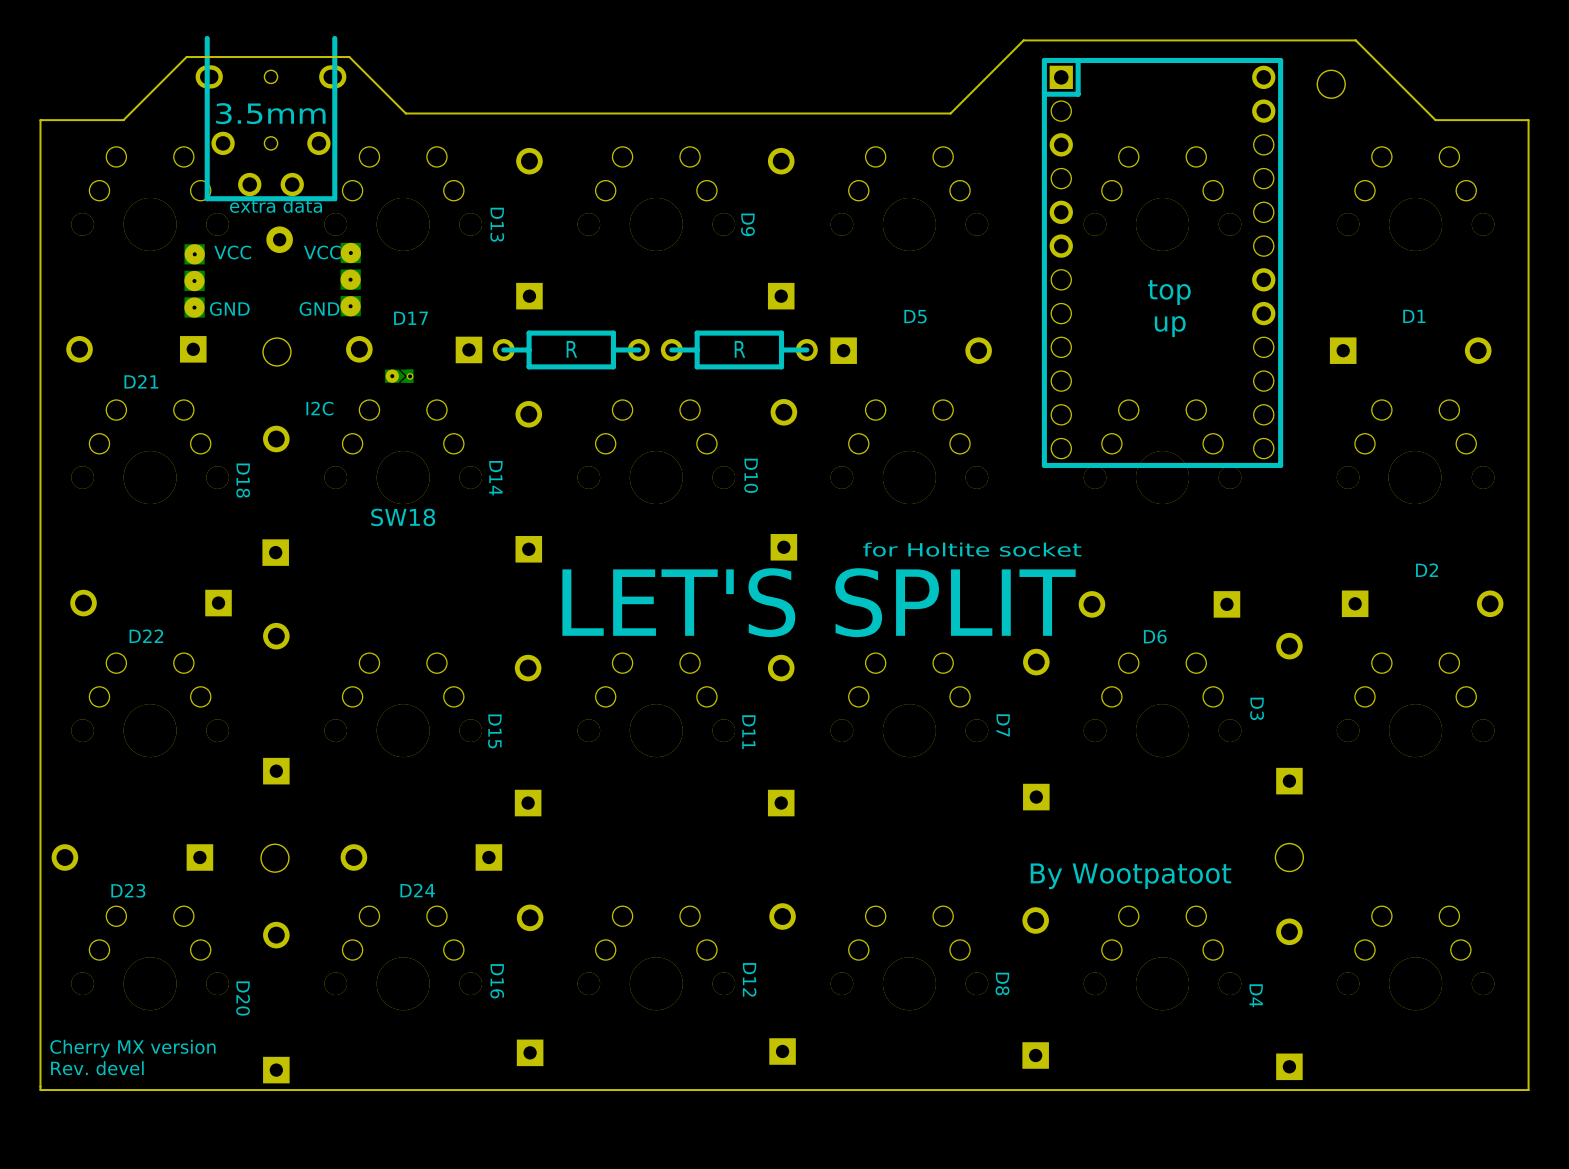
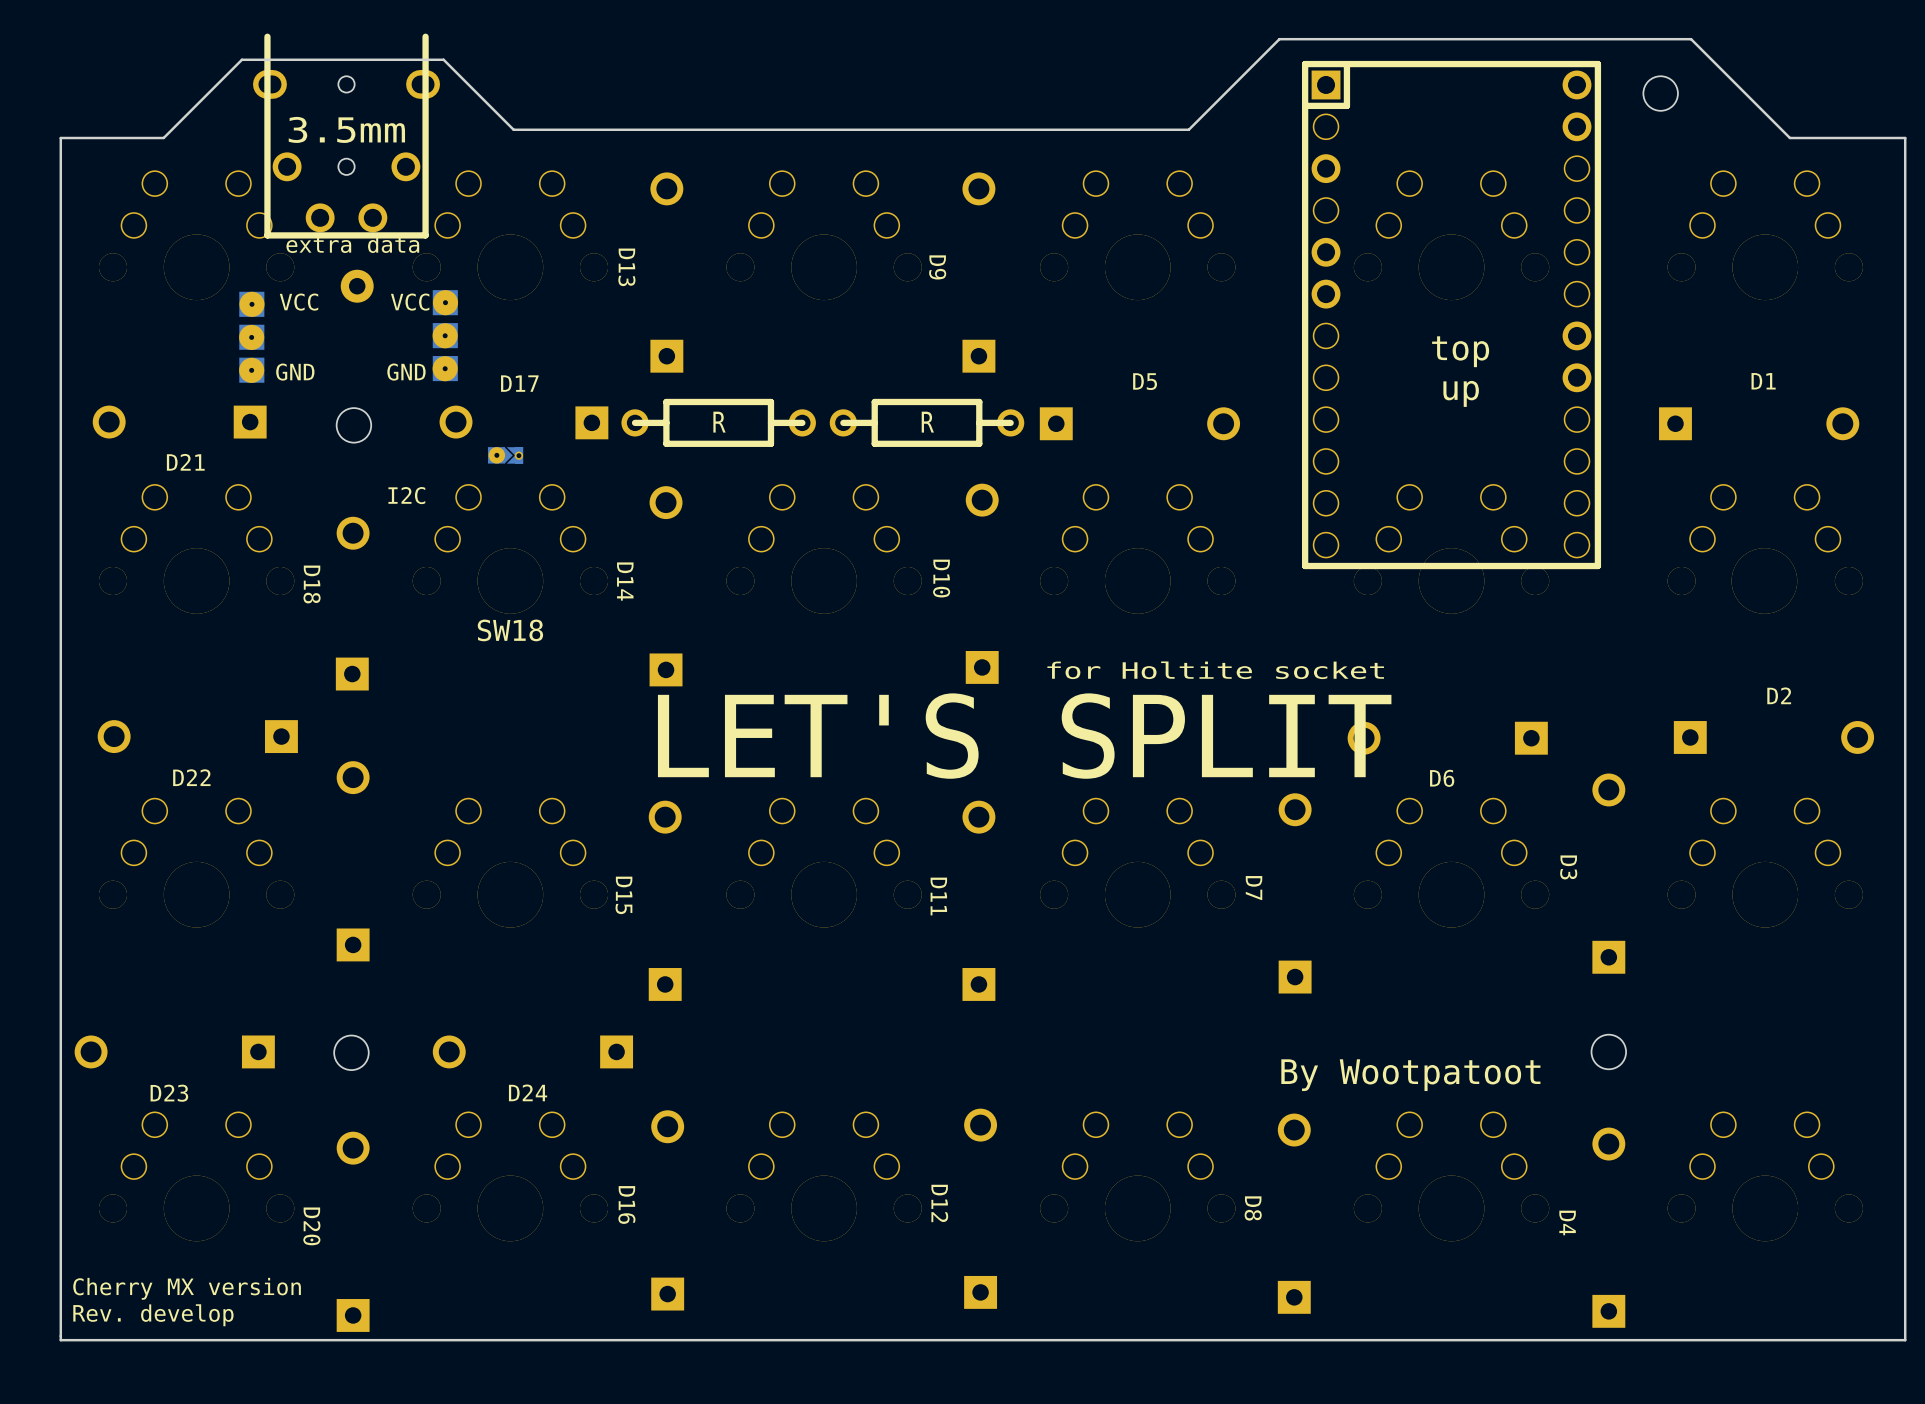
text: Rev. devel (97, 1068) -> Rev. develop (153, 1315)

